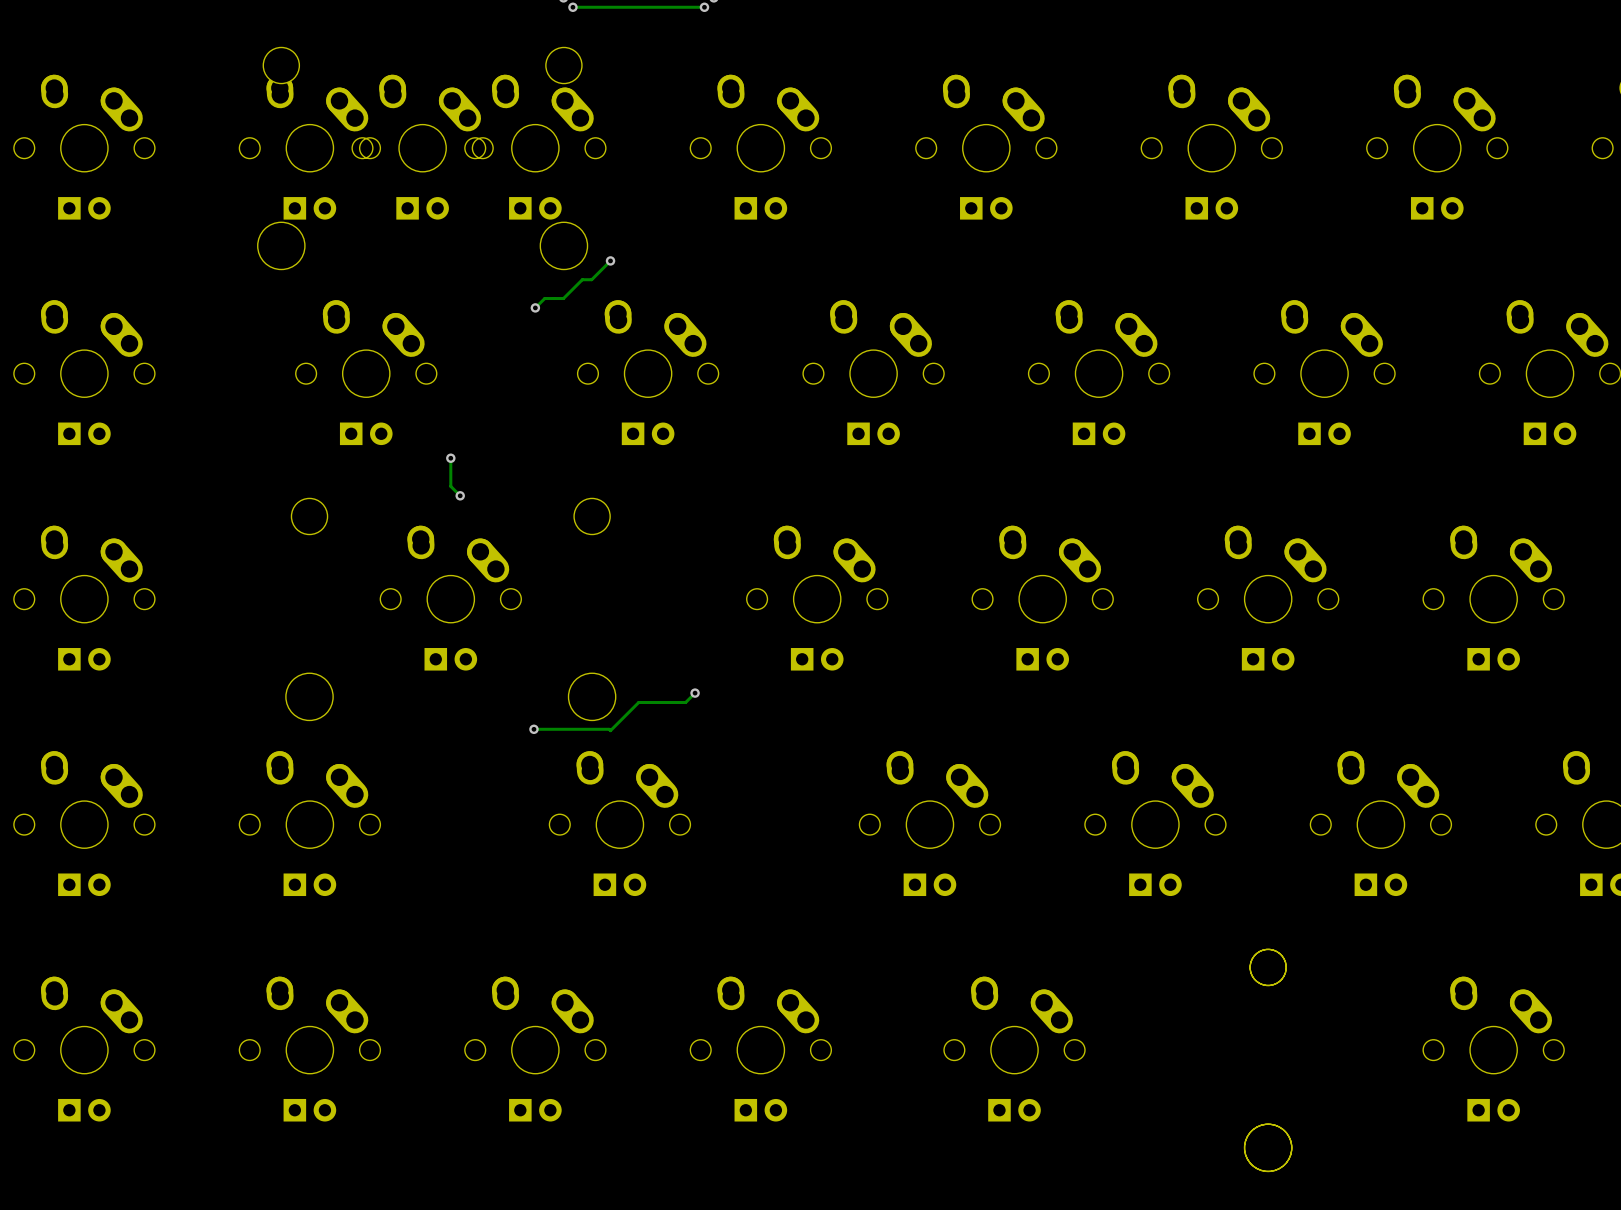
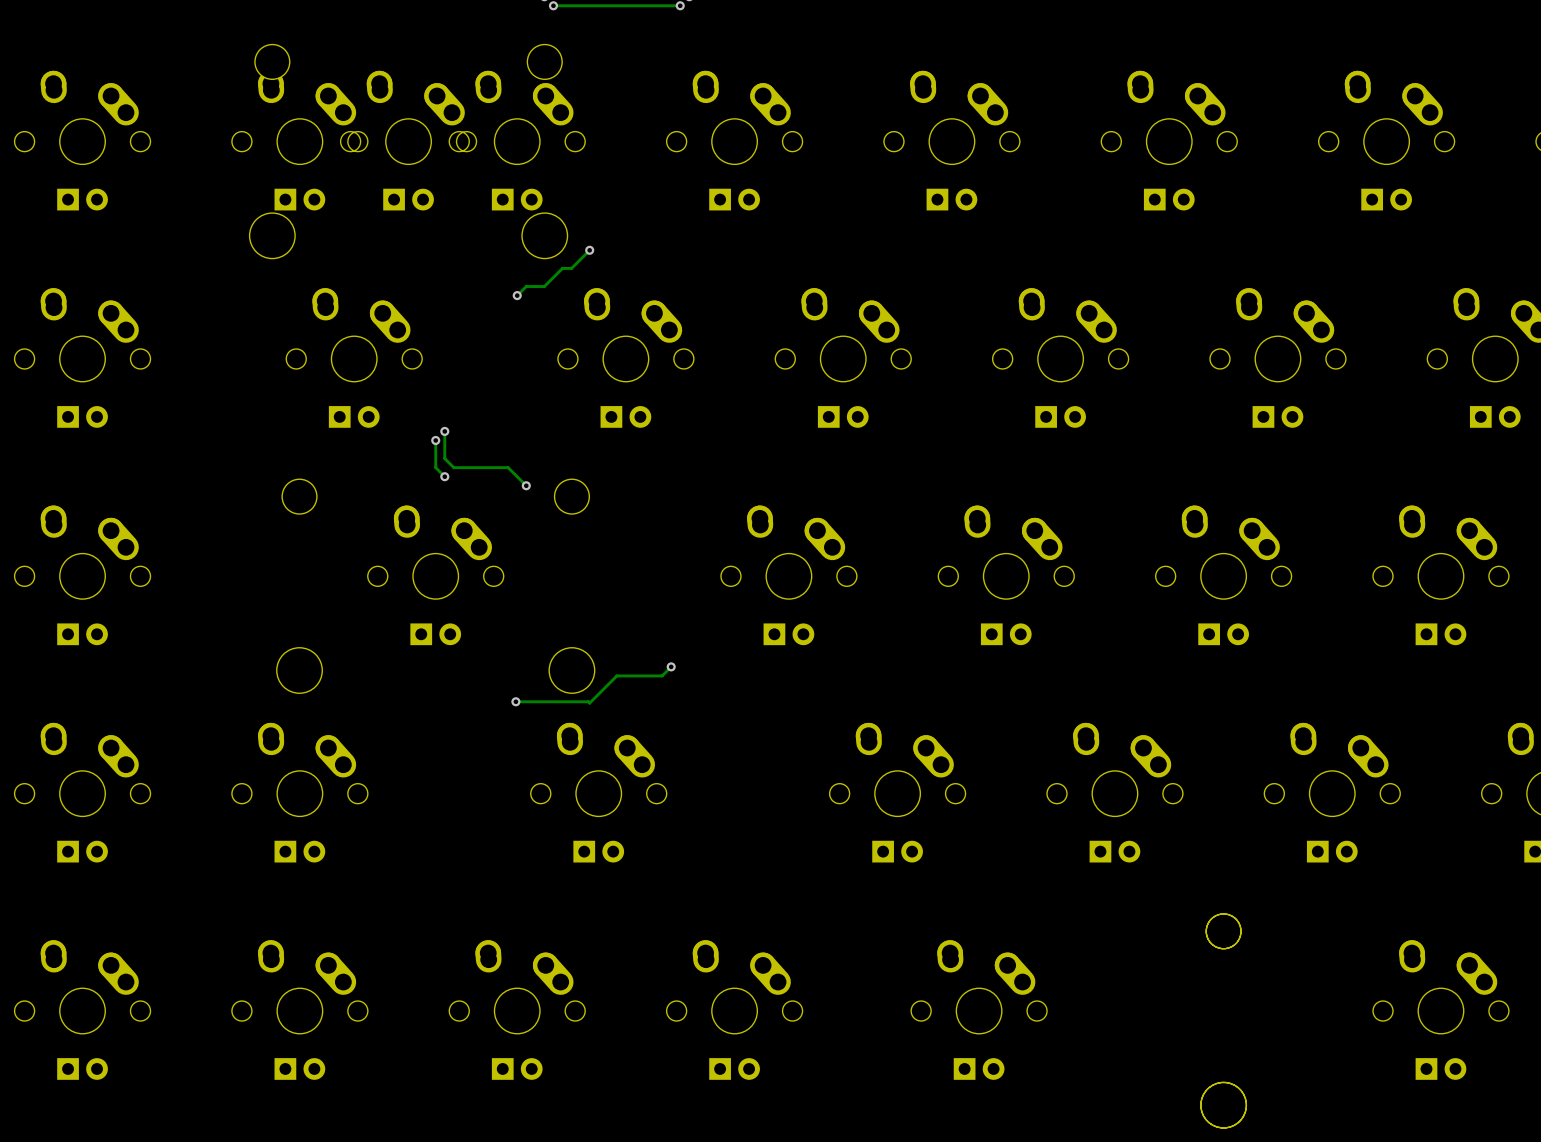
track: none -> (444, 431) (444, 458) (453, 467) (508, 467) (526, 485)
via: none -> (444, 431)
via: none -> (526, 485)

